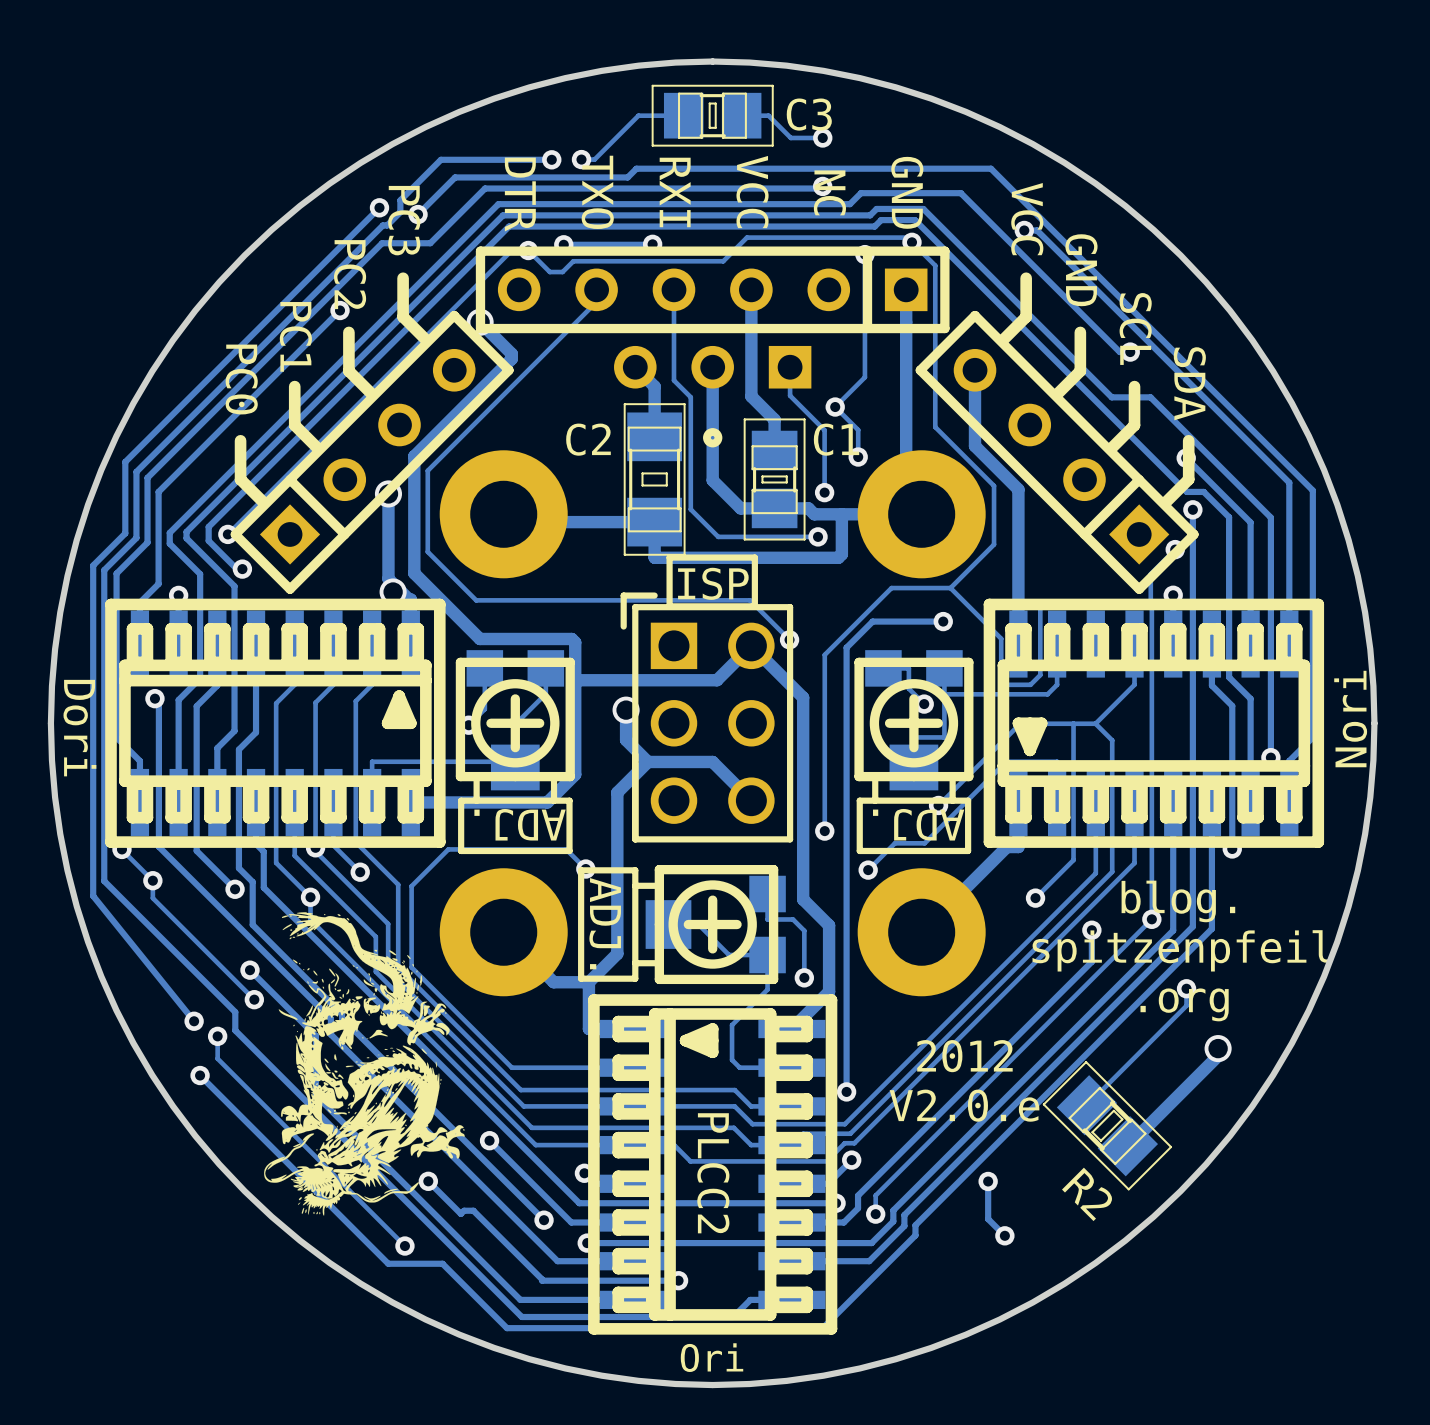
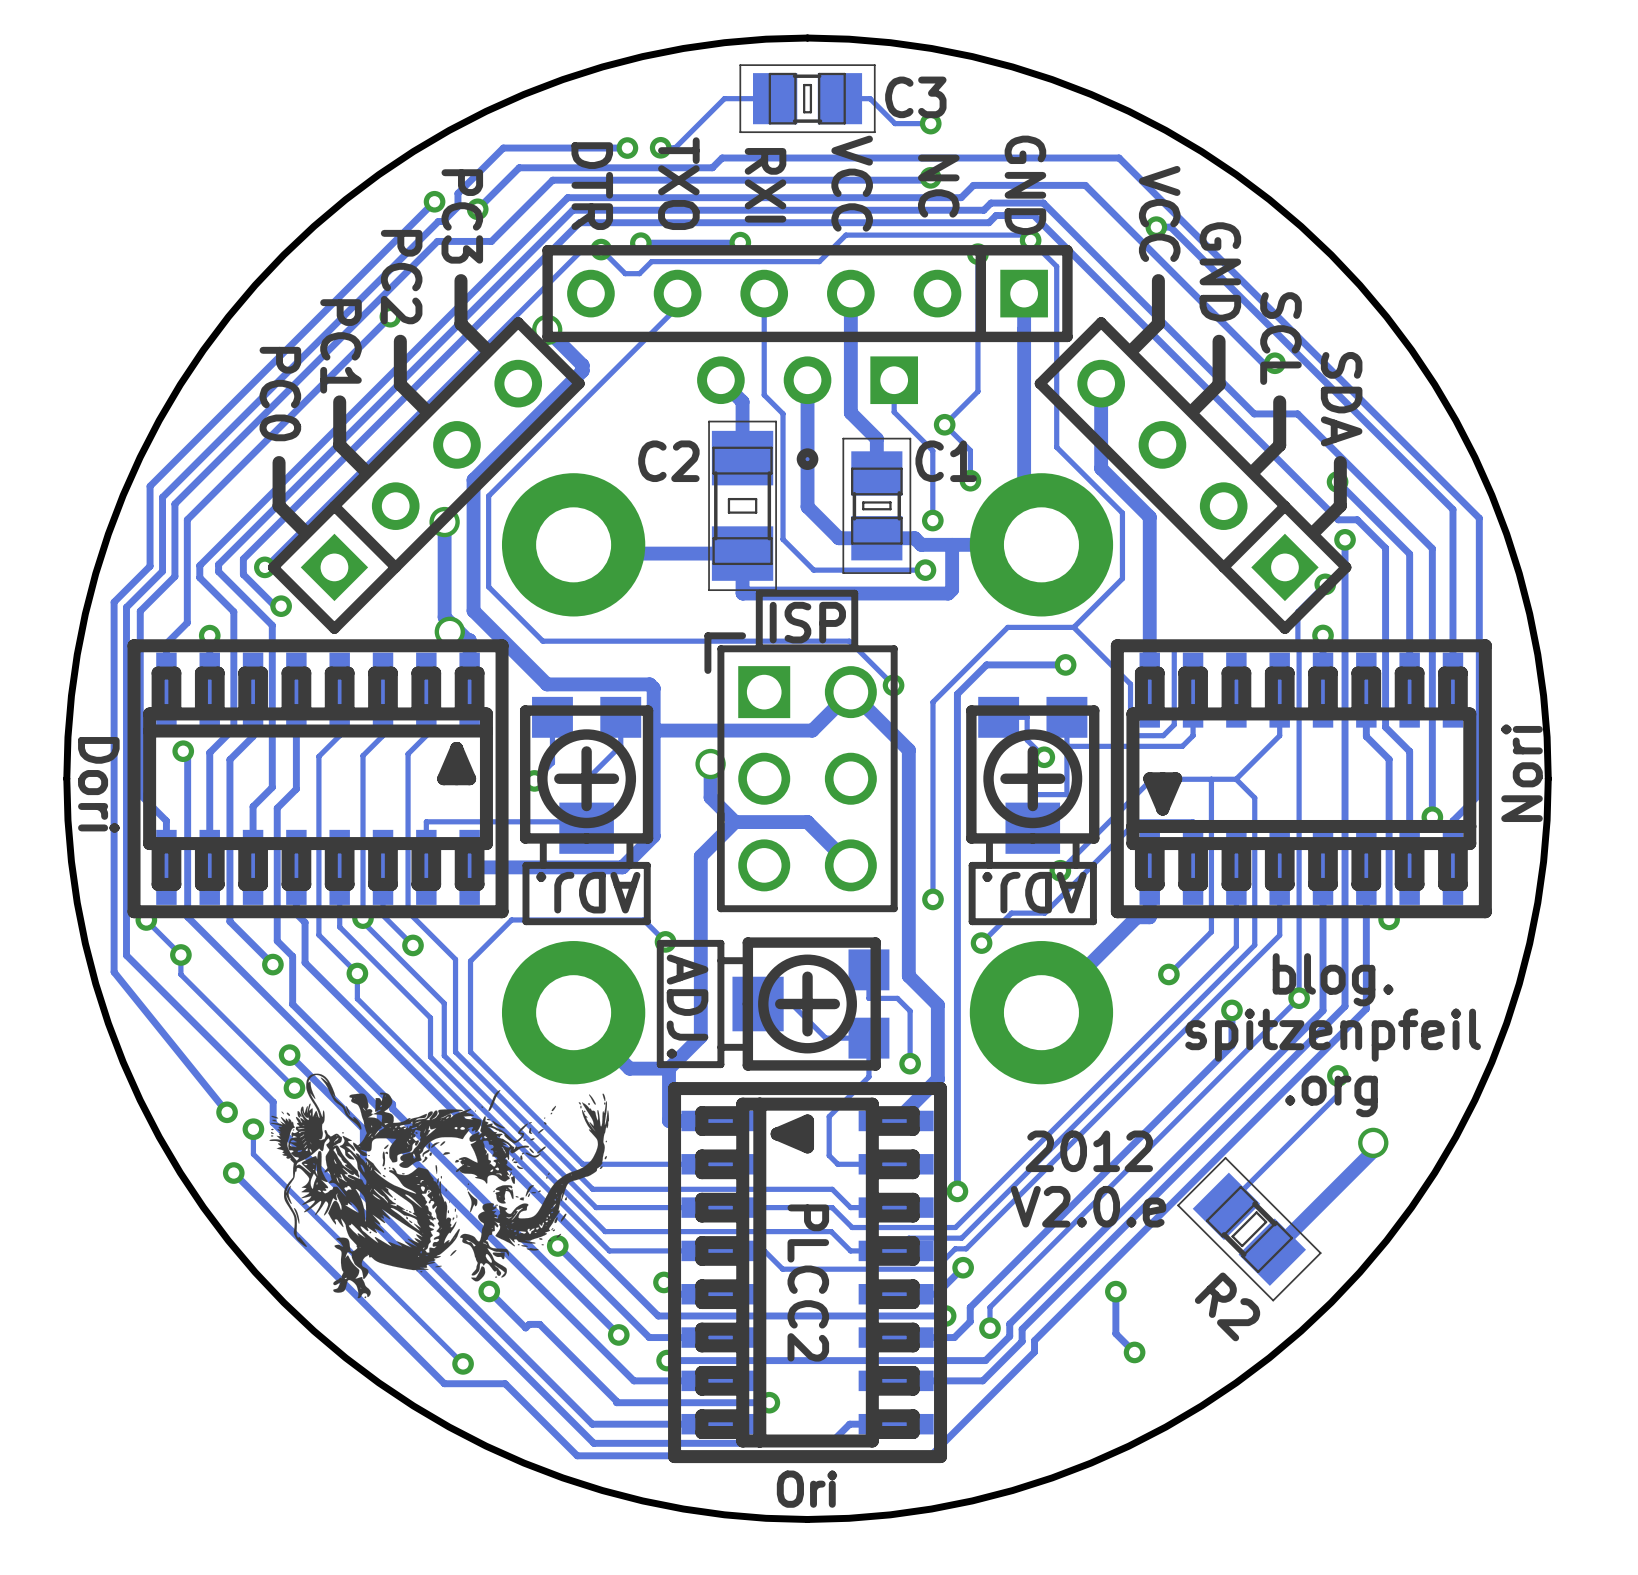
drawing shape: [264, 912, 465, 1216] -> [269, 1073, 610, 1299]

